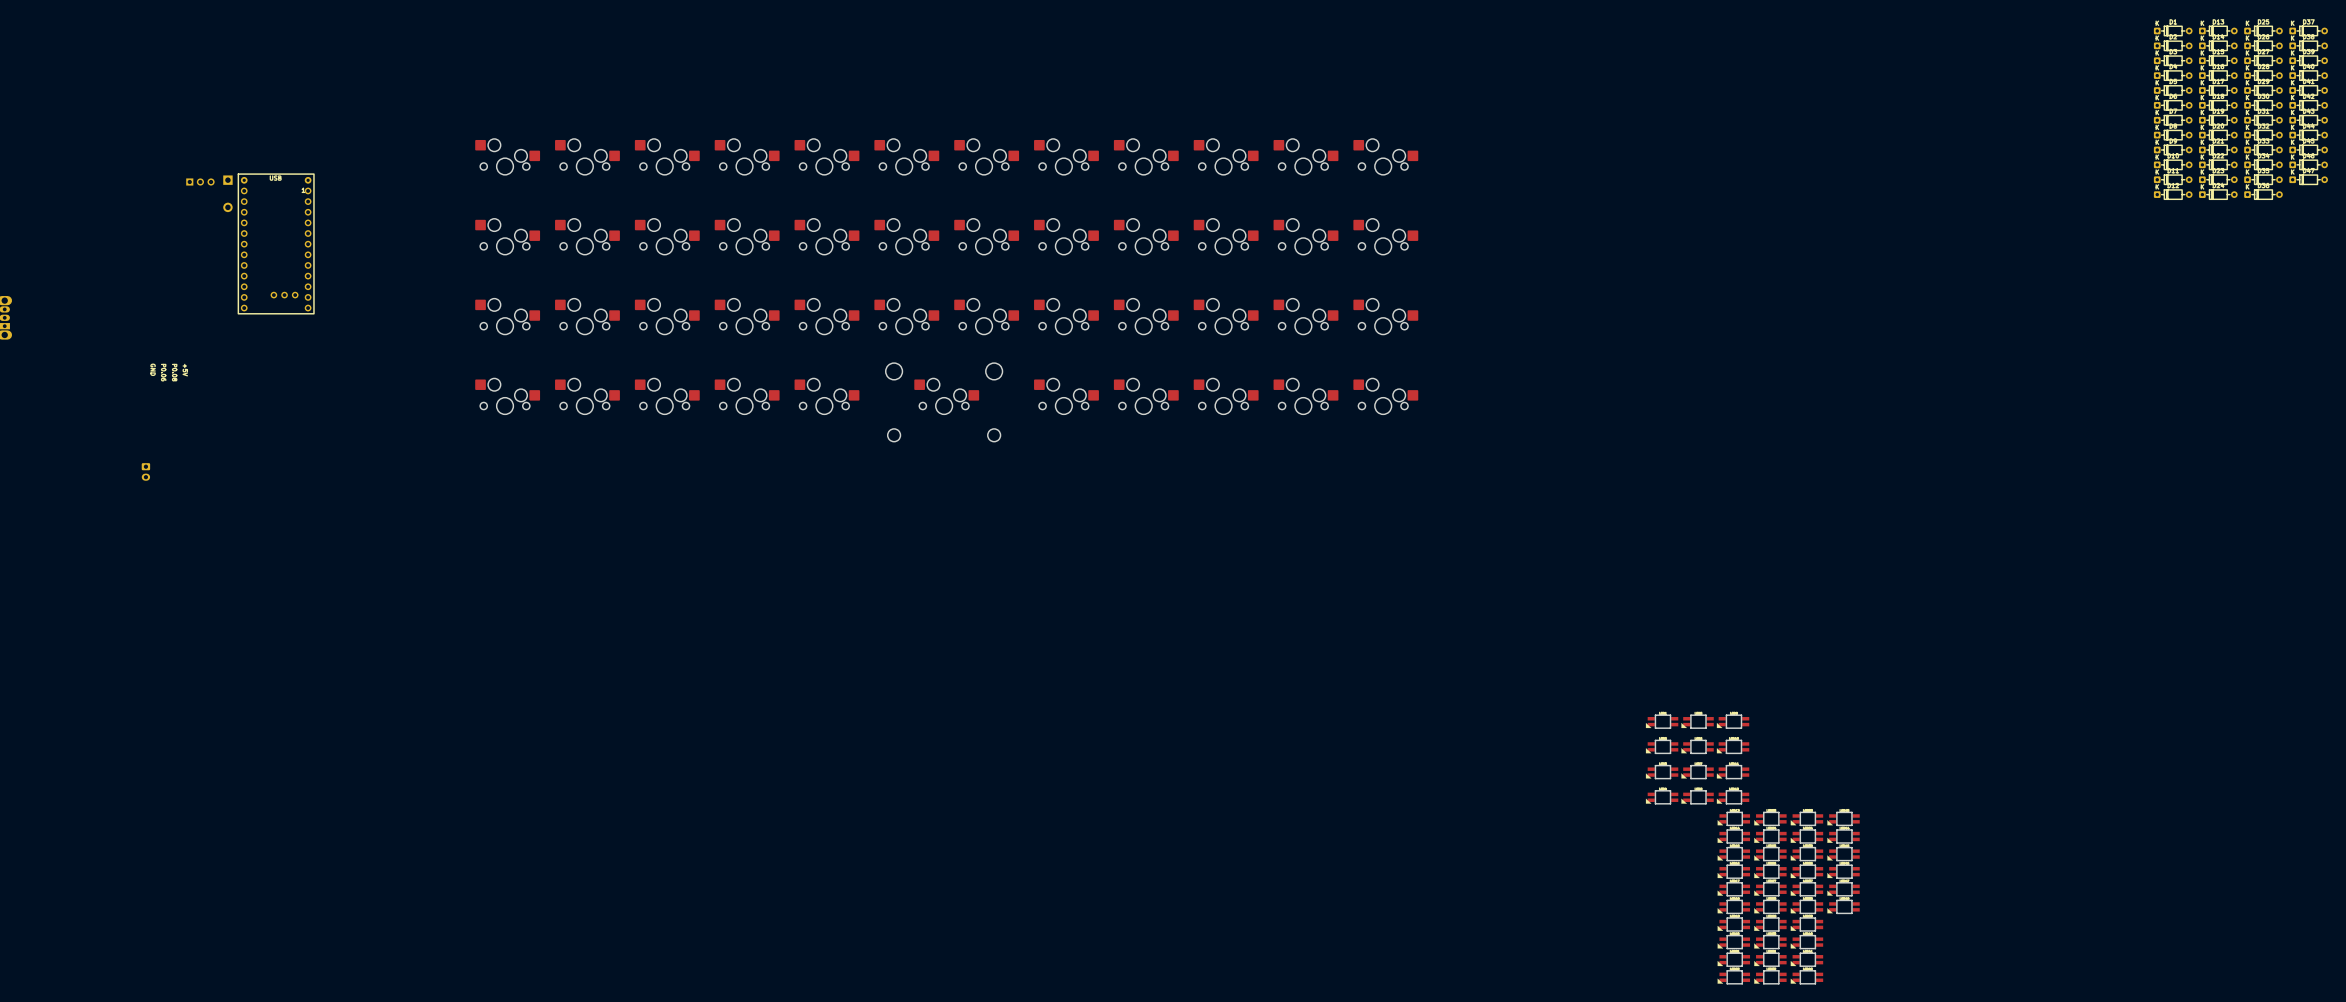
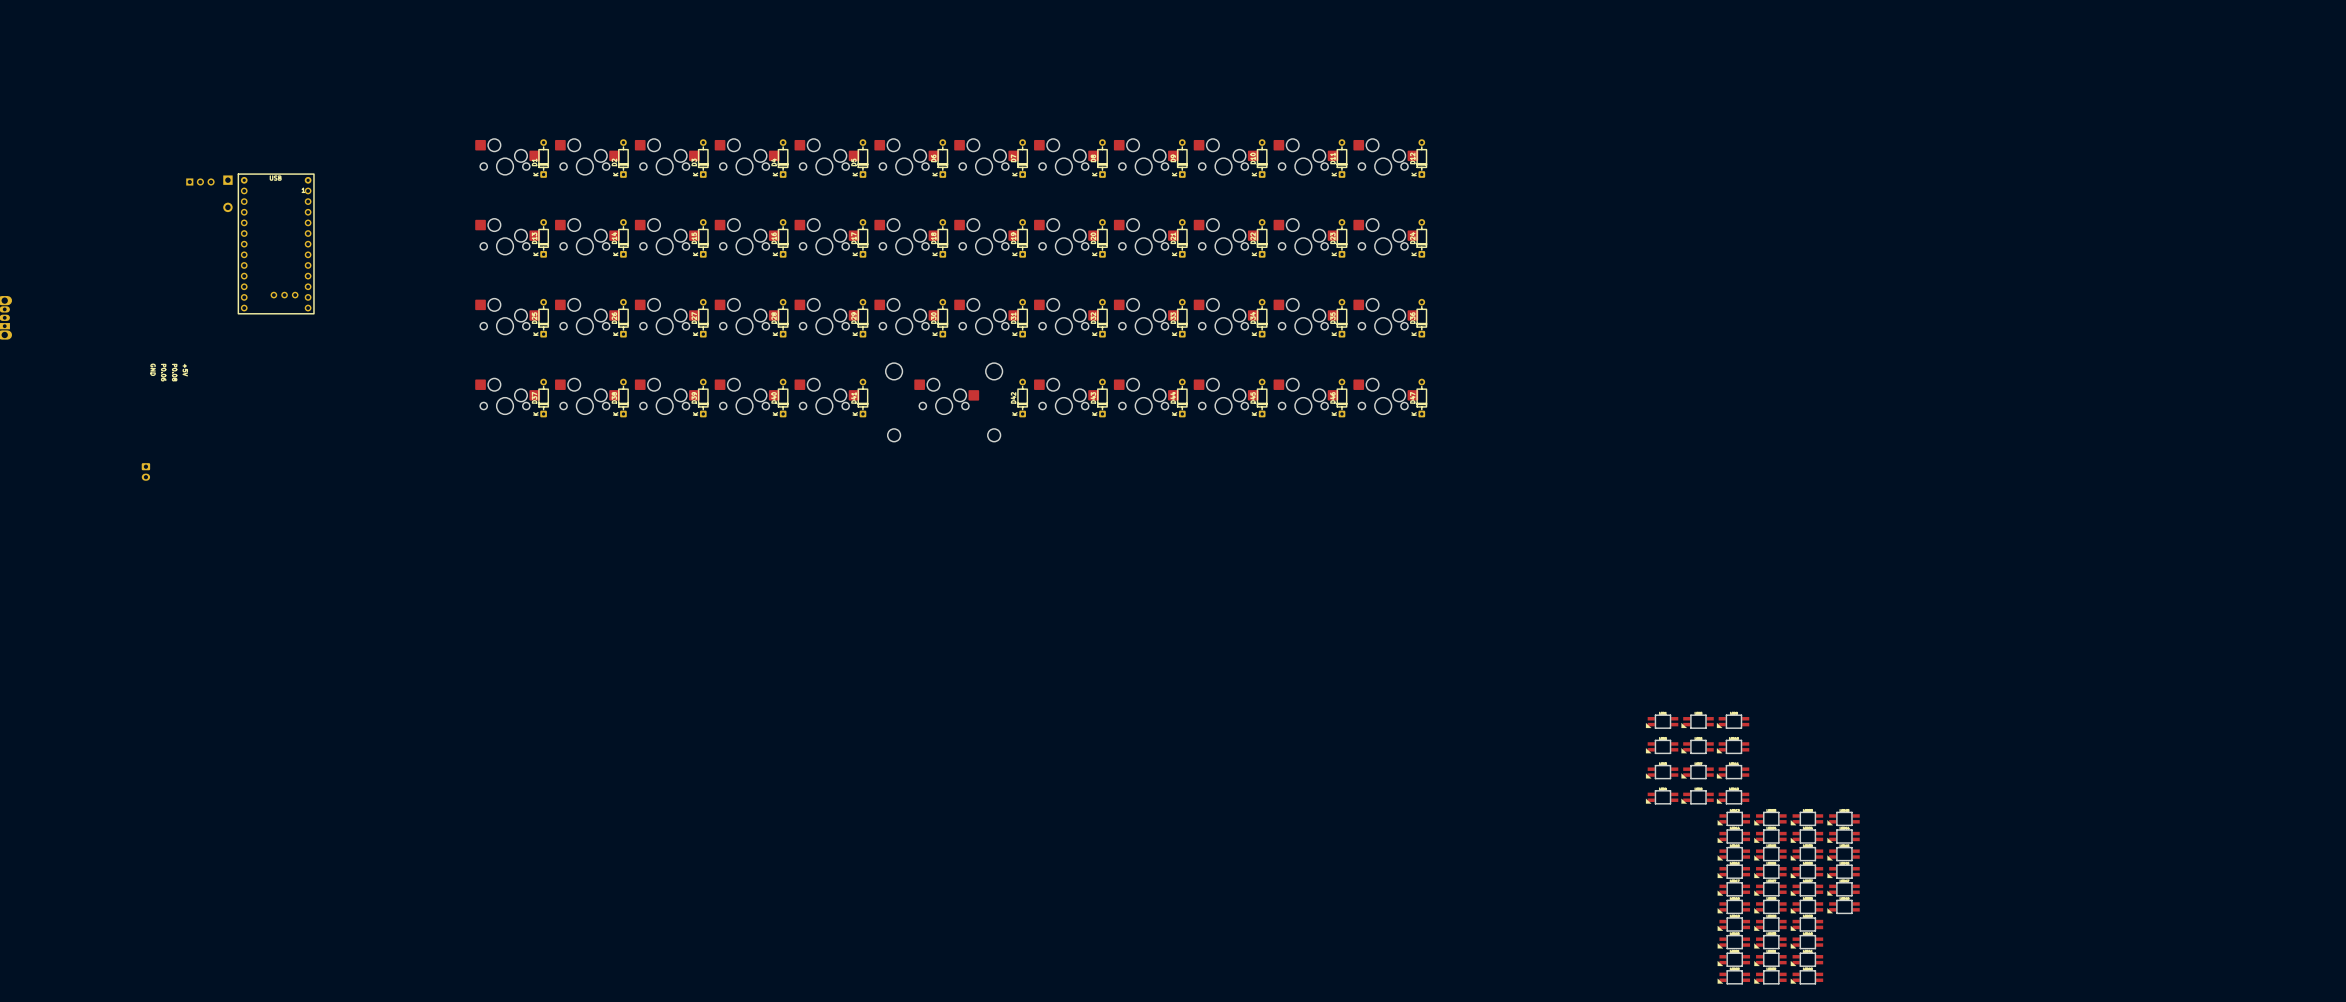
part rotation: 0° (2173, 30) -> 90° counterclockwise (543, 158)
part position: (2173, 30) -> (543, 158)
part rotation: 0° (2218, 30) -> 90° counterclockwise (543, 238)
part position: (2218, 30) -> (543, 238)
part rotation: 0° (2263, 30) -> 90° counterclockwise (543, 318)
part position: (2263, 30) -> (543, 318)
part rotation: 0° (2308, 30) -> 90° counterclockwise (543, 398)
part position: (2308, 30) -> (543, 398)
part rotation: 0° (2173, 45) -> 90° counterclockwise (623, 158)
part position: (2173, 45) -> (623, 158)
part rotation: 0° (2218, 45) -> 90° counterclockwise (623, 238)
part position: (2218, 45) -> (623, 238)
part rotation: 0° (2263, 45) -> 90° counterclockwise (623, 318)
part position: (2263, 45) -> (623, 318)
part rotation: 0° (2308, 45) -> 90° counterclockwise (623, 398)
part position: (2308, 45) -> (623, 398)
part rotation: 0° (2173, 60) -> 90° counterclockwise (703, 158)
part position: (2173, 60) -> (703, 158)
part rotation: 0° (2218, 60) -> 90° counterclockwise (703, 238)
part position: (2218, 60) -> (703, 238)
part rotation: 0° (2263, 60) -> 90° counterclockwise (703, 318)
part position: (2263, 60) -> (703, 318)
part rotation: 0° (2308, 60) -> 90° counterclockwise (703, 398)
part position: (2308, 60) -> (703, 398)
part rotation: 0° (2173, 75) -> 90° counterclockwise (783, 158)
part position: (2173, 75) -> (783, 158)
part rotation: 0° (2218, 75) -> 90° counterclockwise (783, 238)
part position: (2218, 75) -> (783, 238)
part rotation: 0° (2263, 75) -> 90° counterclockwise (783, 318)
part position: (2263, 75) -> (783, 318)
part rotation: 0° (2308, 75) -> 90° counterclockwise (783, 398)
part position: (2308, 75) -> (783, 398)
part rotation: 0° (2173, 90) -> 90° counterclockwise (862, 158)
part position: (2173, 90) -> (862, 158)
part rotation: 0° (2218, 90) -> 90° counterclockwise (862, 238)
part position: (2218, 90) -> (862, 238)
part rotation: 0° (2263, 90) -> 90° counterclockwise (862, 318)
part position: (2263, 90) -> (862, 318)
part rotation: 0° (2308, 90) -> 90° counterclockwise (862, 398)
part position: (2308, 90) -> (862, 398)
part rotation: 0° (2173, 105) -> 90° counterclockwise (942, 158)
part position: (2173, 105) -> (942, 158)
part rotation: 0° (2218, 105) -> 90° counterclockwise (942, 238)
part position: (2218, 105) -> (942, 238)
part rotation: 0° (2263, 105) -> 90° counterclockwise (942, 318)
part position: (2263, 105) -> (942, 318)
part rotation: 0° (2308, 105) -> 90° counterclockwise (1022, 398)
part position: (2308, 105) -> (1022, 398)
part rotation: 0° (2173, 120) -> 90° counterclockwise (1022, 158)
part position: (2173, 120) -> (1022, 158)
part rotation: 0° (2218, 120) -> 90° counterclockwise (1022, 238)
part position: (2218, 120) -> (1022, 238)
part rotation: 0° (2263, 120) -> 90° counterclockwise (1022, 318)
part position: (2263, 120) -> (1022, 318)
part rotation: 0° (2308, 120) -> 90° counterclockwise (1102, 398)
part position: (2308, 120) -> (1102, 398)
part rotation: 0° (2173, 135) -> 90° counterclockwise (1102, 158)
part position: (2173, 135) -> (1102, 158)
part rotation: 0° (2218, 135) -> 90° counterclockwise (1102, 238)
part position: (2218, 135) -> (1102, 238)
part rotation: 0° (2263, 135) -> 90° counterclockwise (1102, 318)
part position: (2263, 135) -> (1102, 318)
part rotation: 0° (2308, 135) -> 90° counterclockwise (1182, 398)
part position: (2308, 135) -> (1182, 398)
part rotation: 0° (2173, 149) -> 90° counterclockwise (1182, 158)
part position: (2173, 149) -> (1182, 158)
part rotation: 0° (2218, 149) -> 90° counterclockwise (1182, 238)
part position: (2218, 149) -> (1182, 238)
part rotation: 0° (2263, 149) -> 90° counterclockwise (1182, 318)
part position: (2263, 149) -> (1182, 318)
part rotation: 0° (2308, 149) -> 90° counterclockwise (1262, 398)
part position: (2308, 149) -> (1262, 398)
part rotation: 0° (2173, 164) -> 90° counterclockwise (1262, 158)
part position: (2173, 164) -> (1262, 158)
part rotation: 0° (2218, 164) -> 90° counterclockwise (1262, 238)
part position: (2218, 164) -> (1262, 238)
part rotation: 0° (2263, 164) -> 90° counterclockwise (1262, 318)
part position: (2263, 164) -> (1262, 318)
part rotation: 0° (2308, 164) -> 90° counterclockwise (1341, 398)
part position: (2308, 164) -> (1341, 398)
part rotation: 0° (2173, 179) -> 90° counterclockwise (1341, 158)
part position: (2173, 179) -> (1341, 158)
part rotation: 0° (2218, 179) -> 90° counterclockwise (1341, 238)
part position: (2218, 179) -> (1341, 238)
part rotation: 0° (2263, 179) -> 90° counterclockwise (1341, 318)
part position: (2263, 179) -> (1341, 318)
part rotation: 0° (2308, 179) -> 90° counterclockwise (1421, 398)
part position: (2308, 179) -> (1421, 398)
part rotation: 0° (2173, 194) -> 90° counterclockwise (1421, 158)
part position: (2173, 194) -> (1421, 158)
part rotation: 0° (2218, 194) -> 90° counterclockwise (1421, 238)
part position: (2218, 194) -> (1421, 238)
part rotation: 0° (2263, 194) -> 90° counterclockwise (1421, 318)
part position: (2263, 194) -> (1421, 318)

